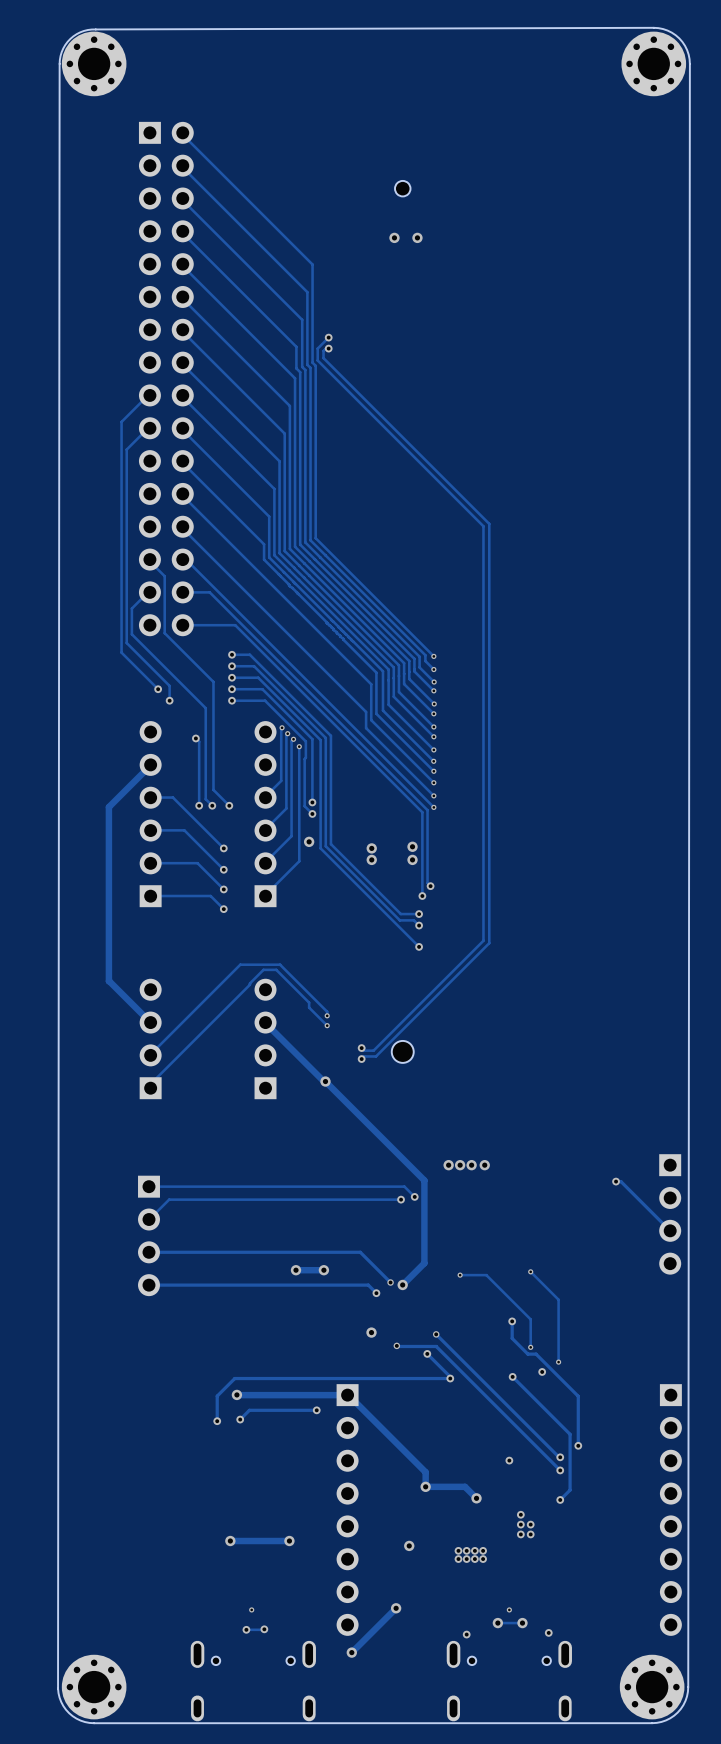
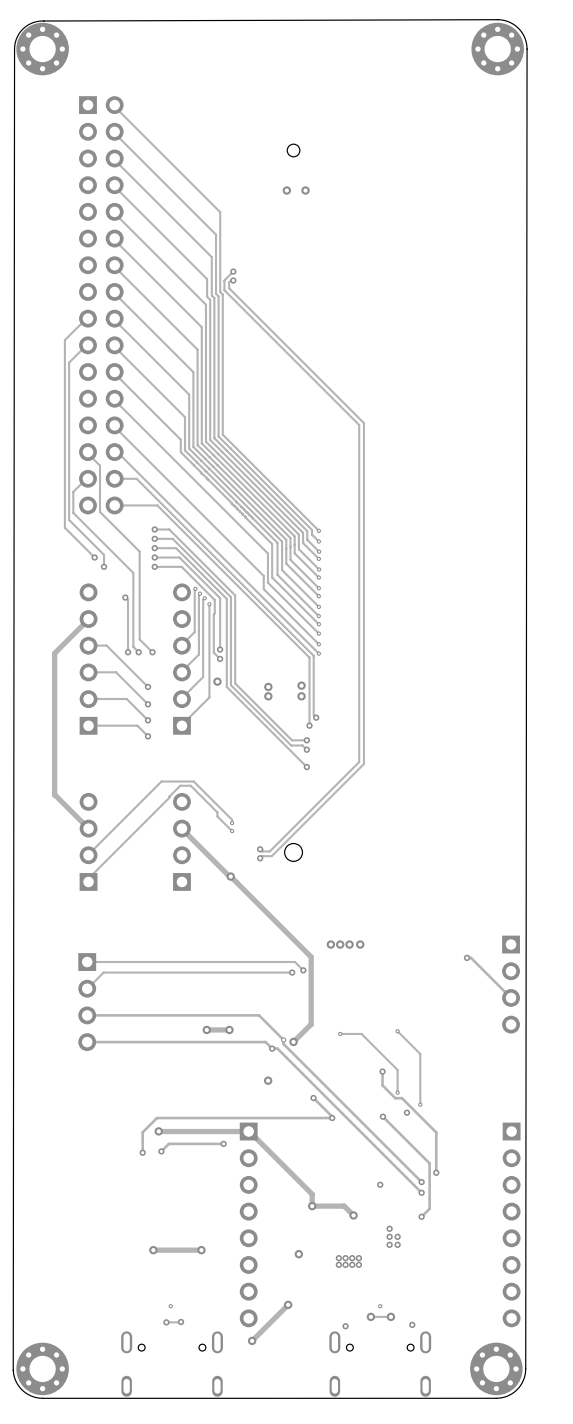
track: (436, 1334) (560, 1457) -> (283, 1039) (283, 1044) (421, 1182)
via: (436, 1334) -> none
track: (396, 1345) (436, 1346) -> (272, 1048) (277, 1048) (320, 1091)
via: (396, 1345) -> none

